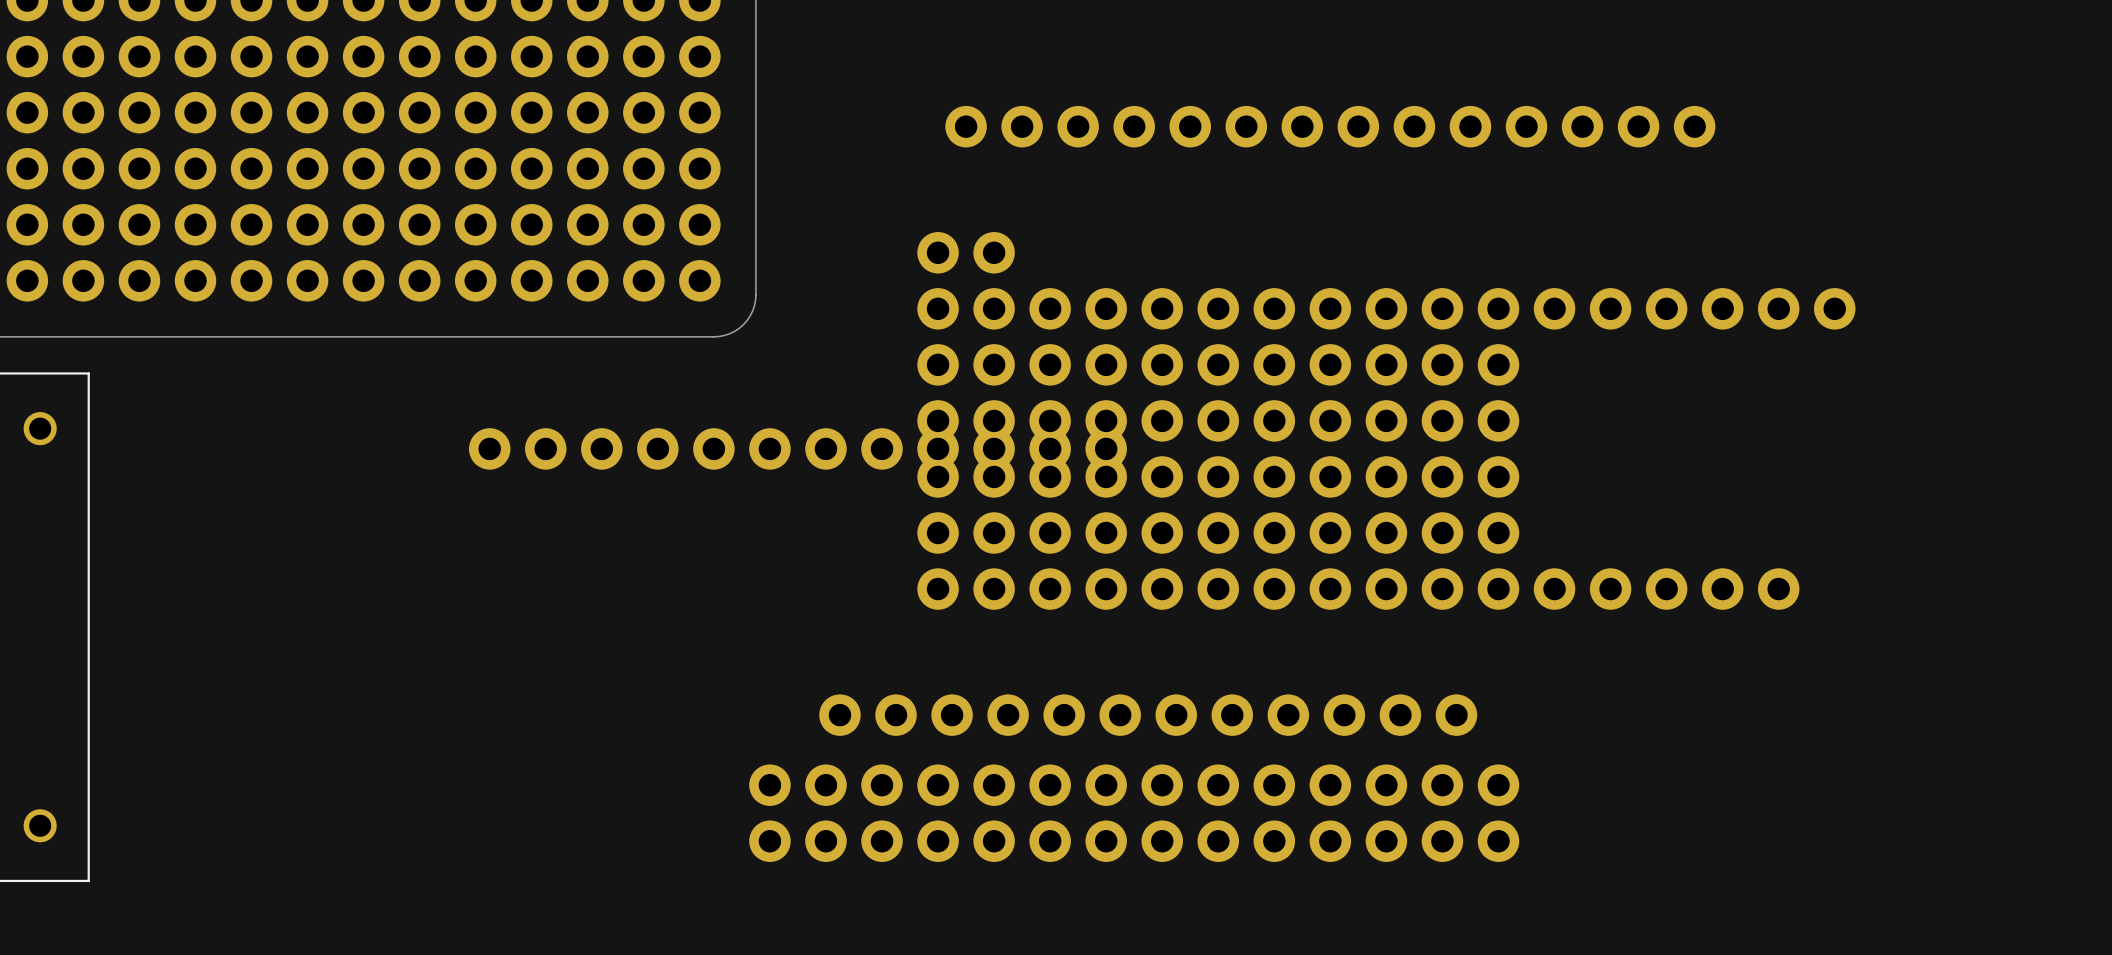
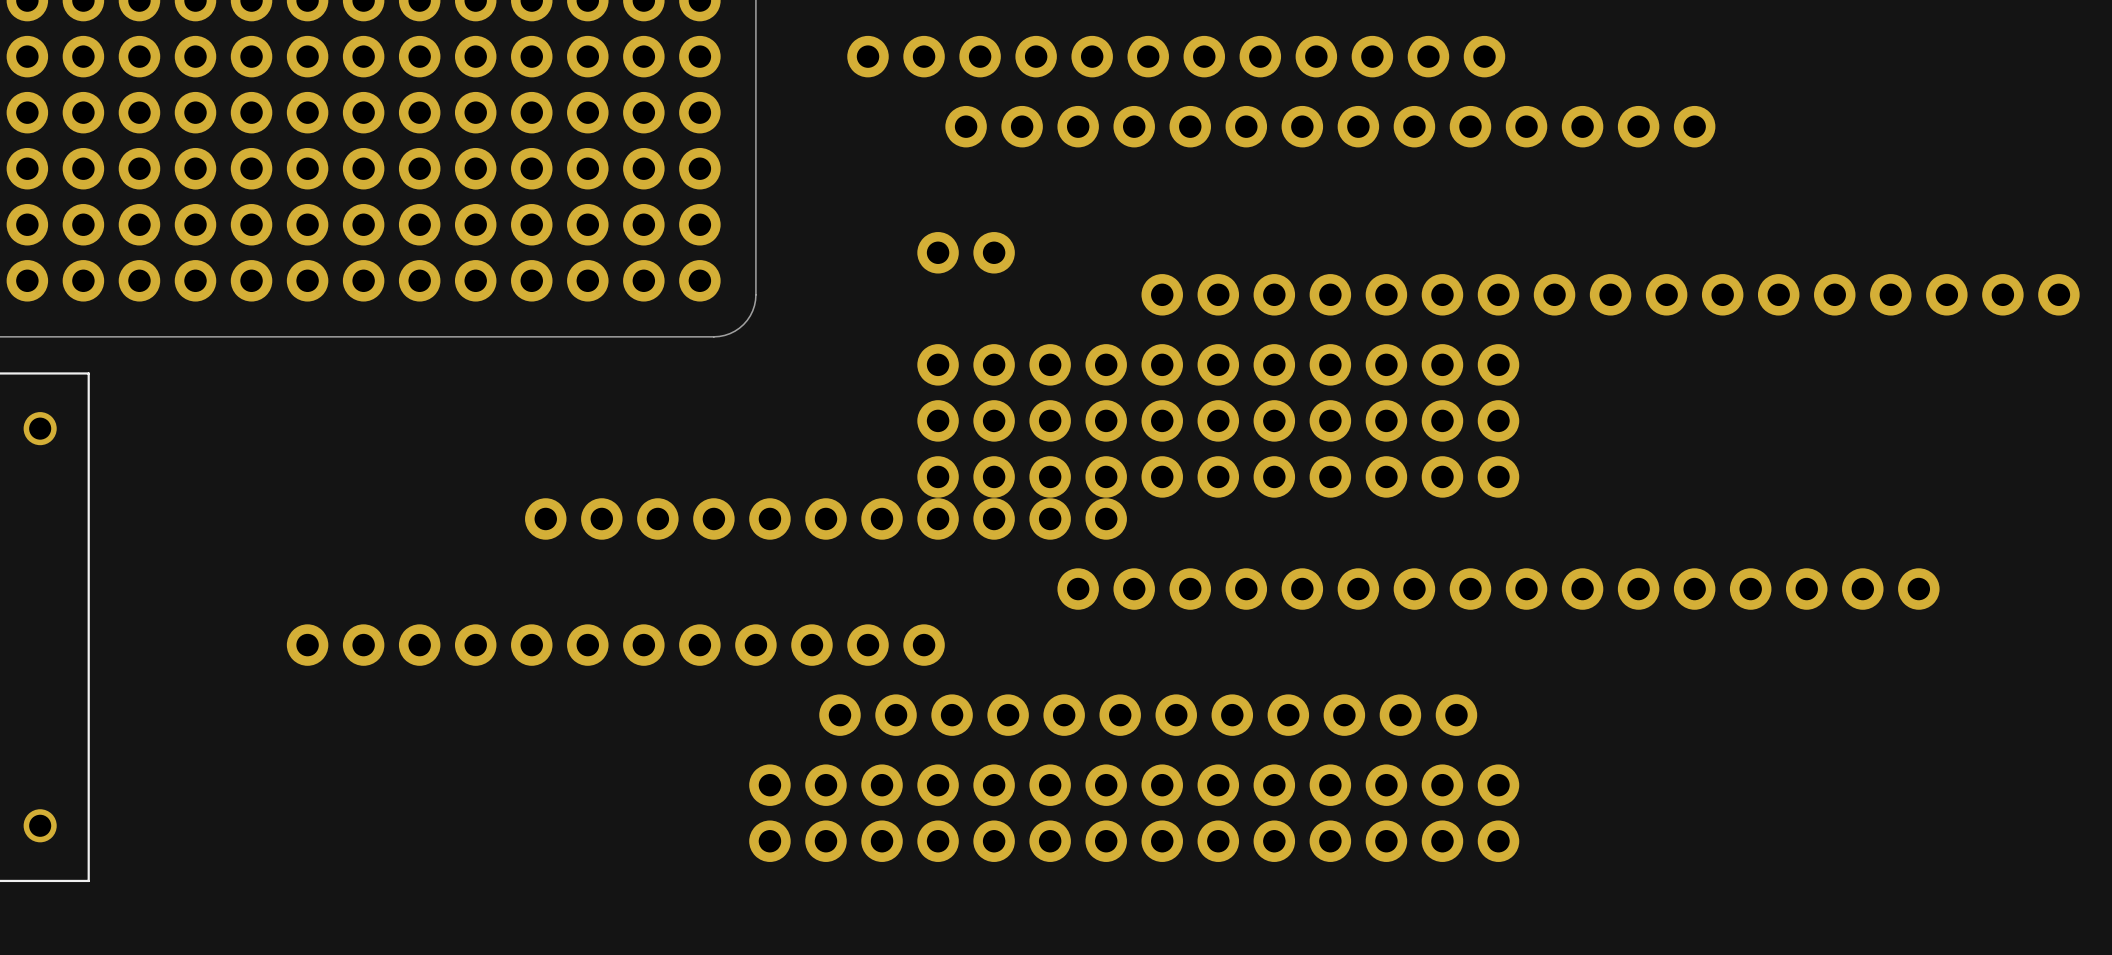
part: none -> (1176, 56)
part position: (1386, 308) -> (1610, 294)
part position: (797, 448) -> (615, 645)
part position: (1218, 532) -> (825, 518)
part position: (1358, 589) -> (1498, 589)

